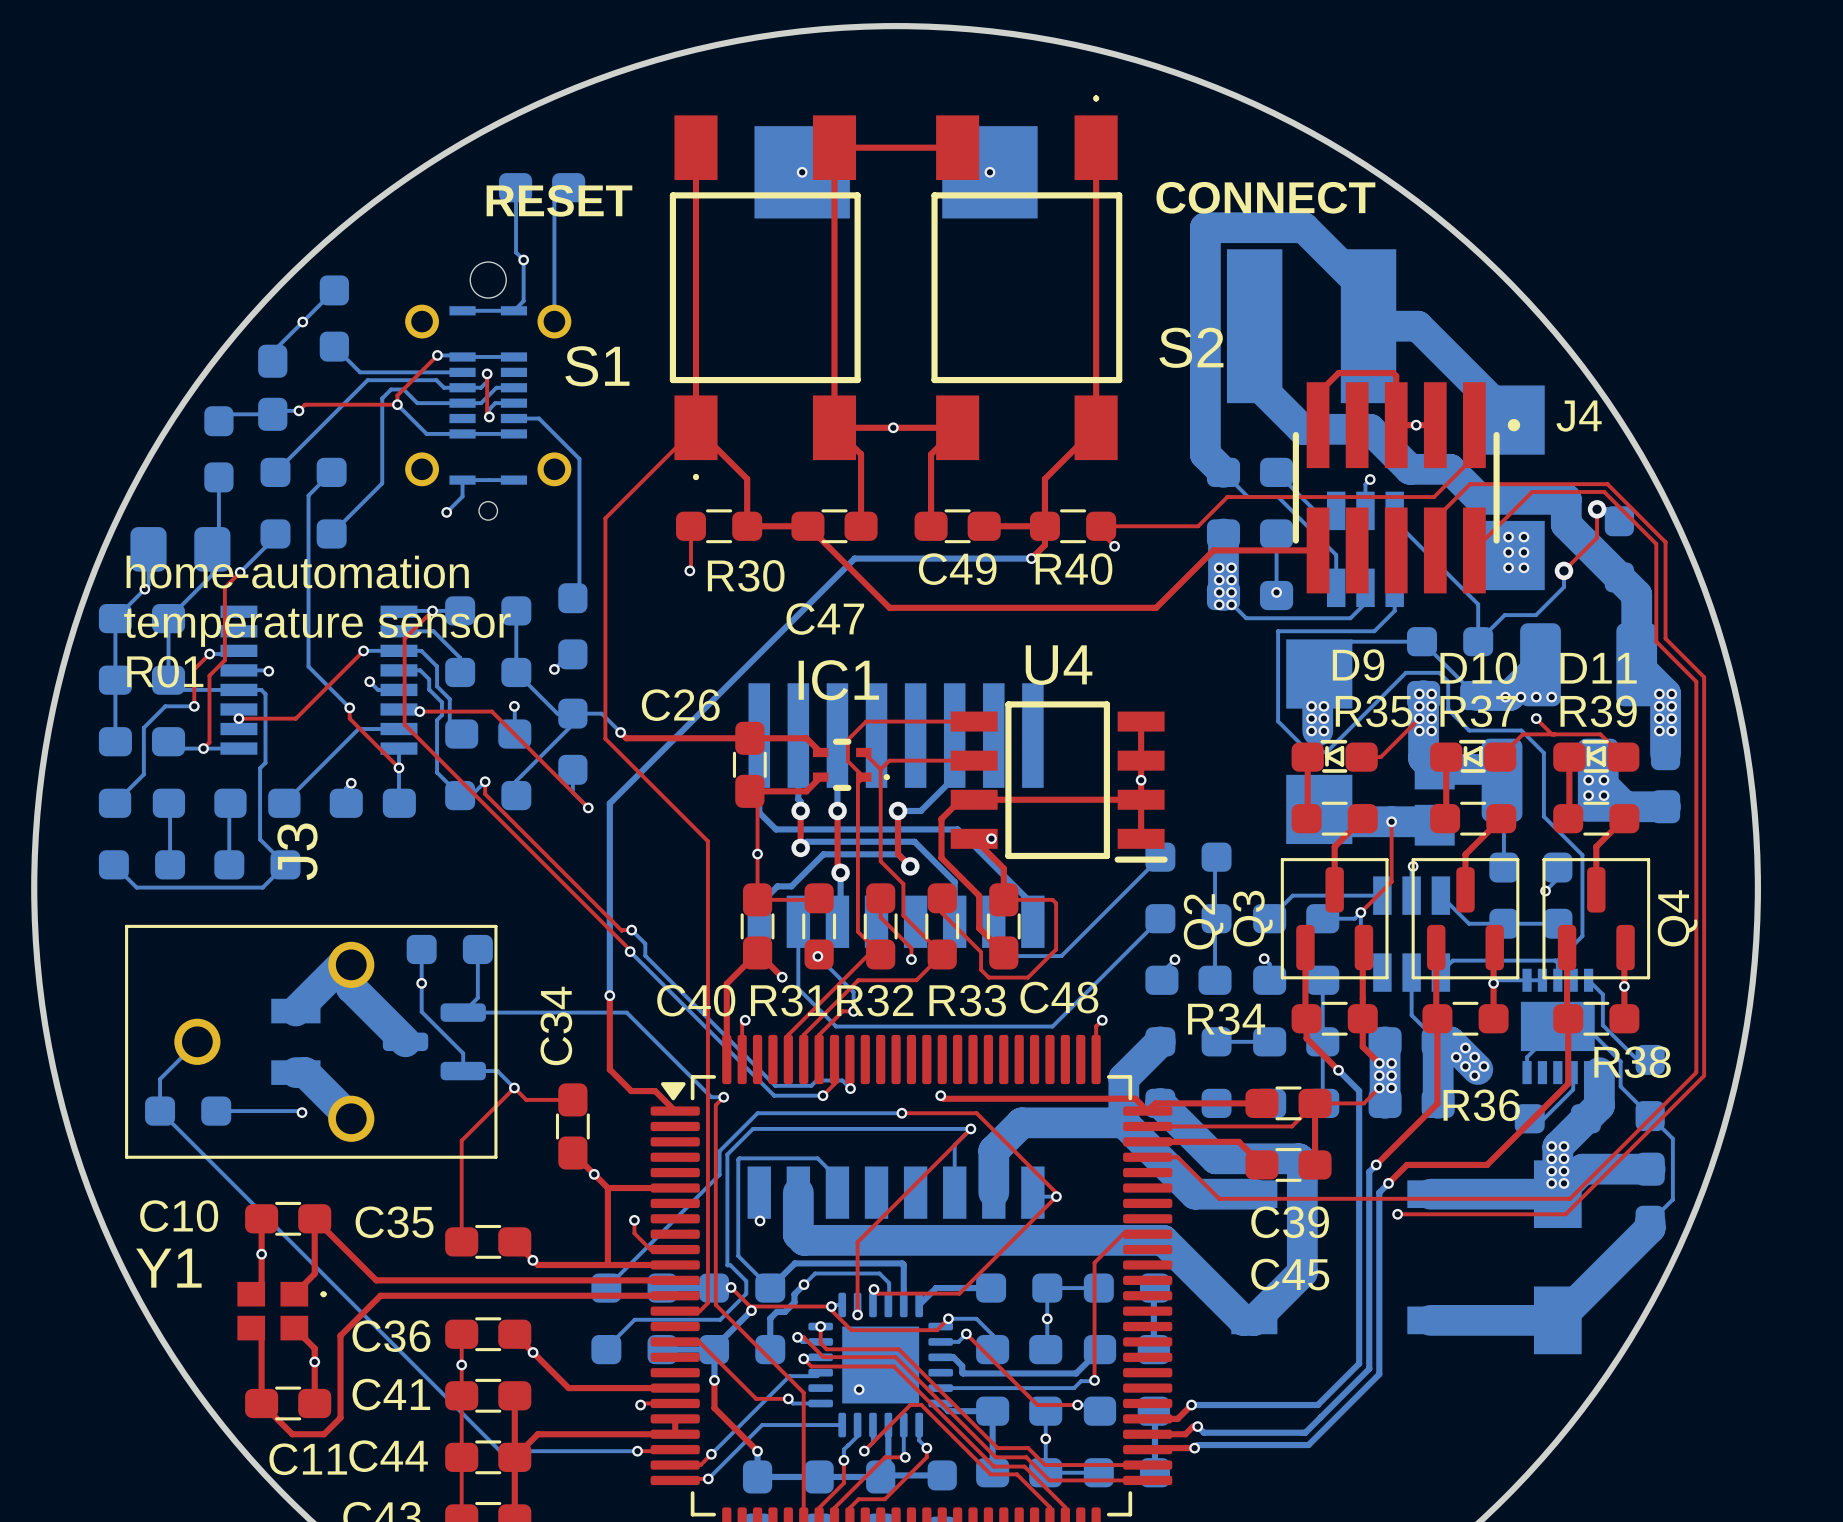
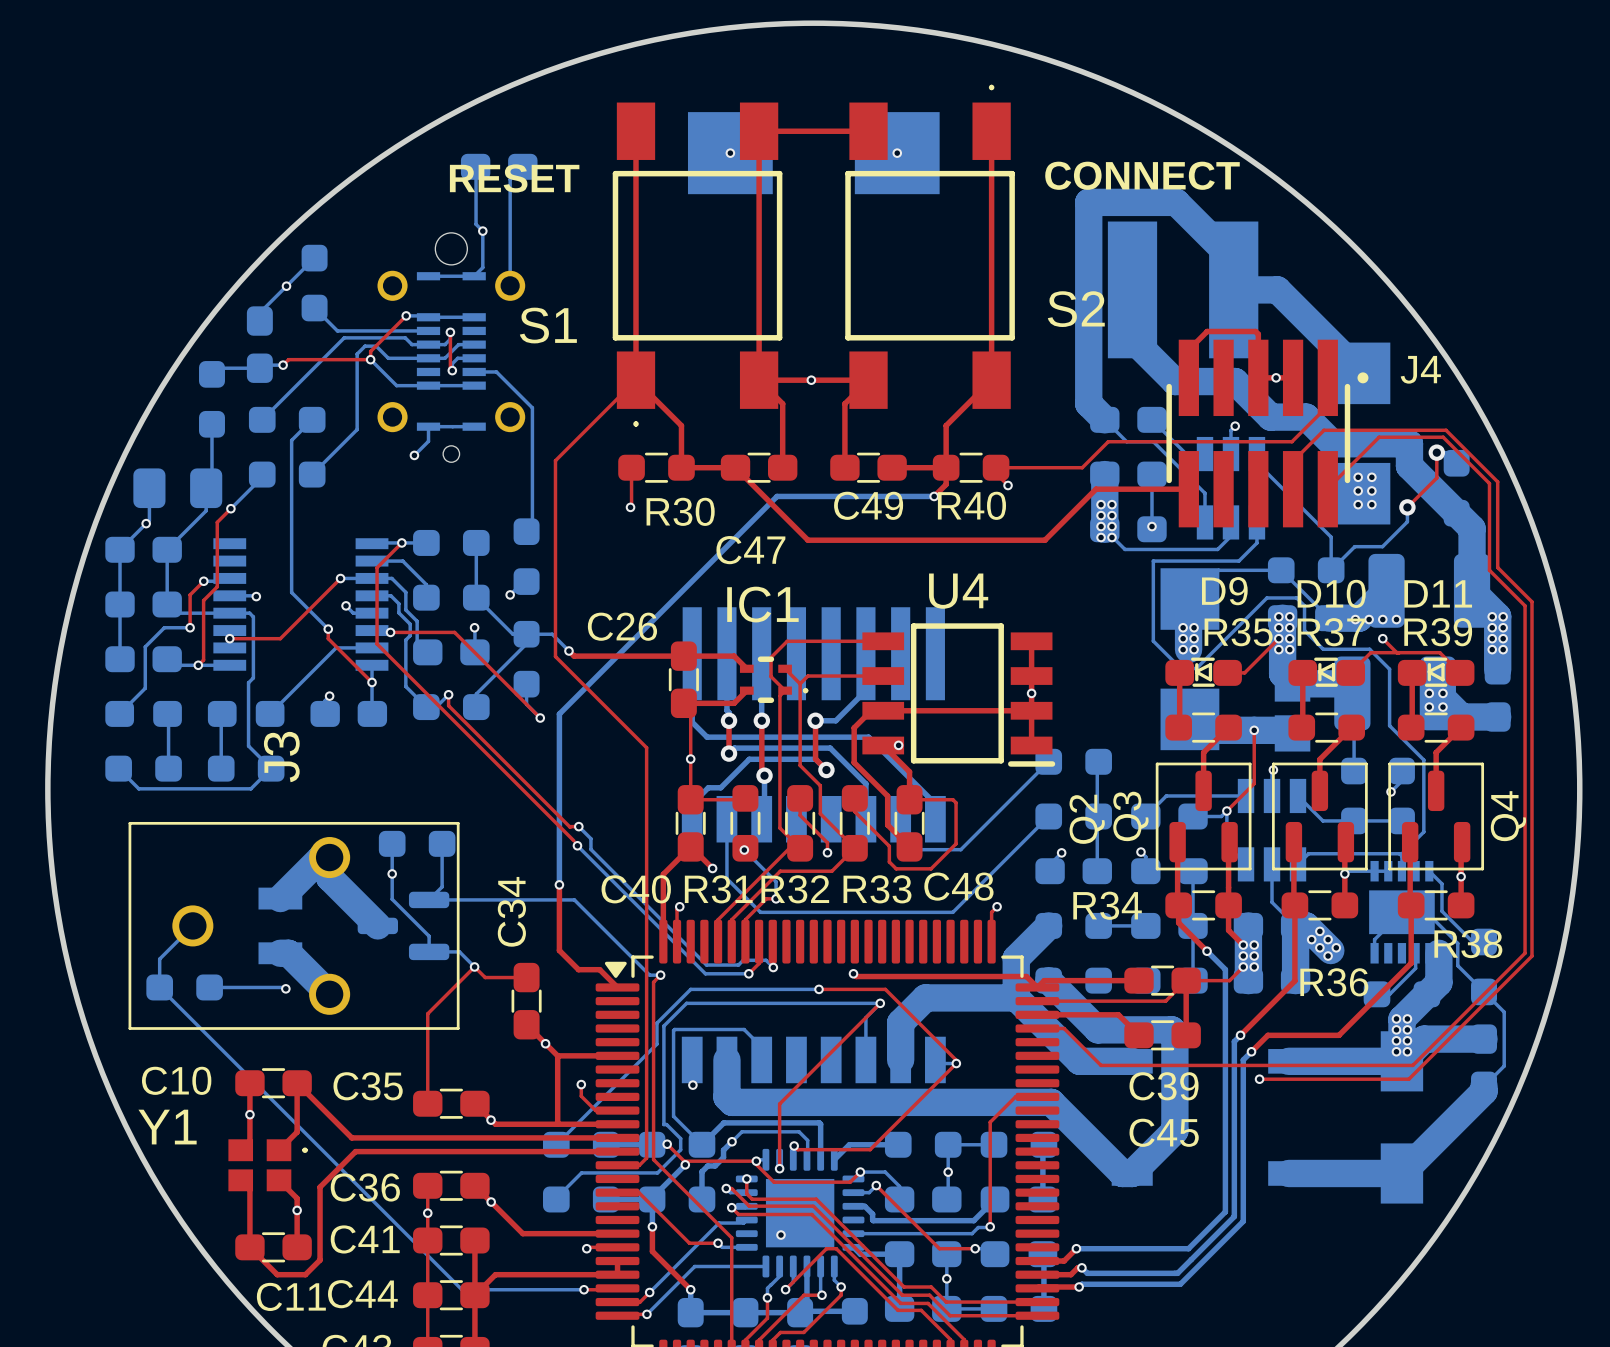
text: home-automation (297, 572) -> none
text: temperature sensor (317, 627) -> none
text: R01 (165, 671) -> none

